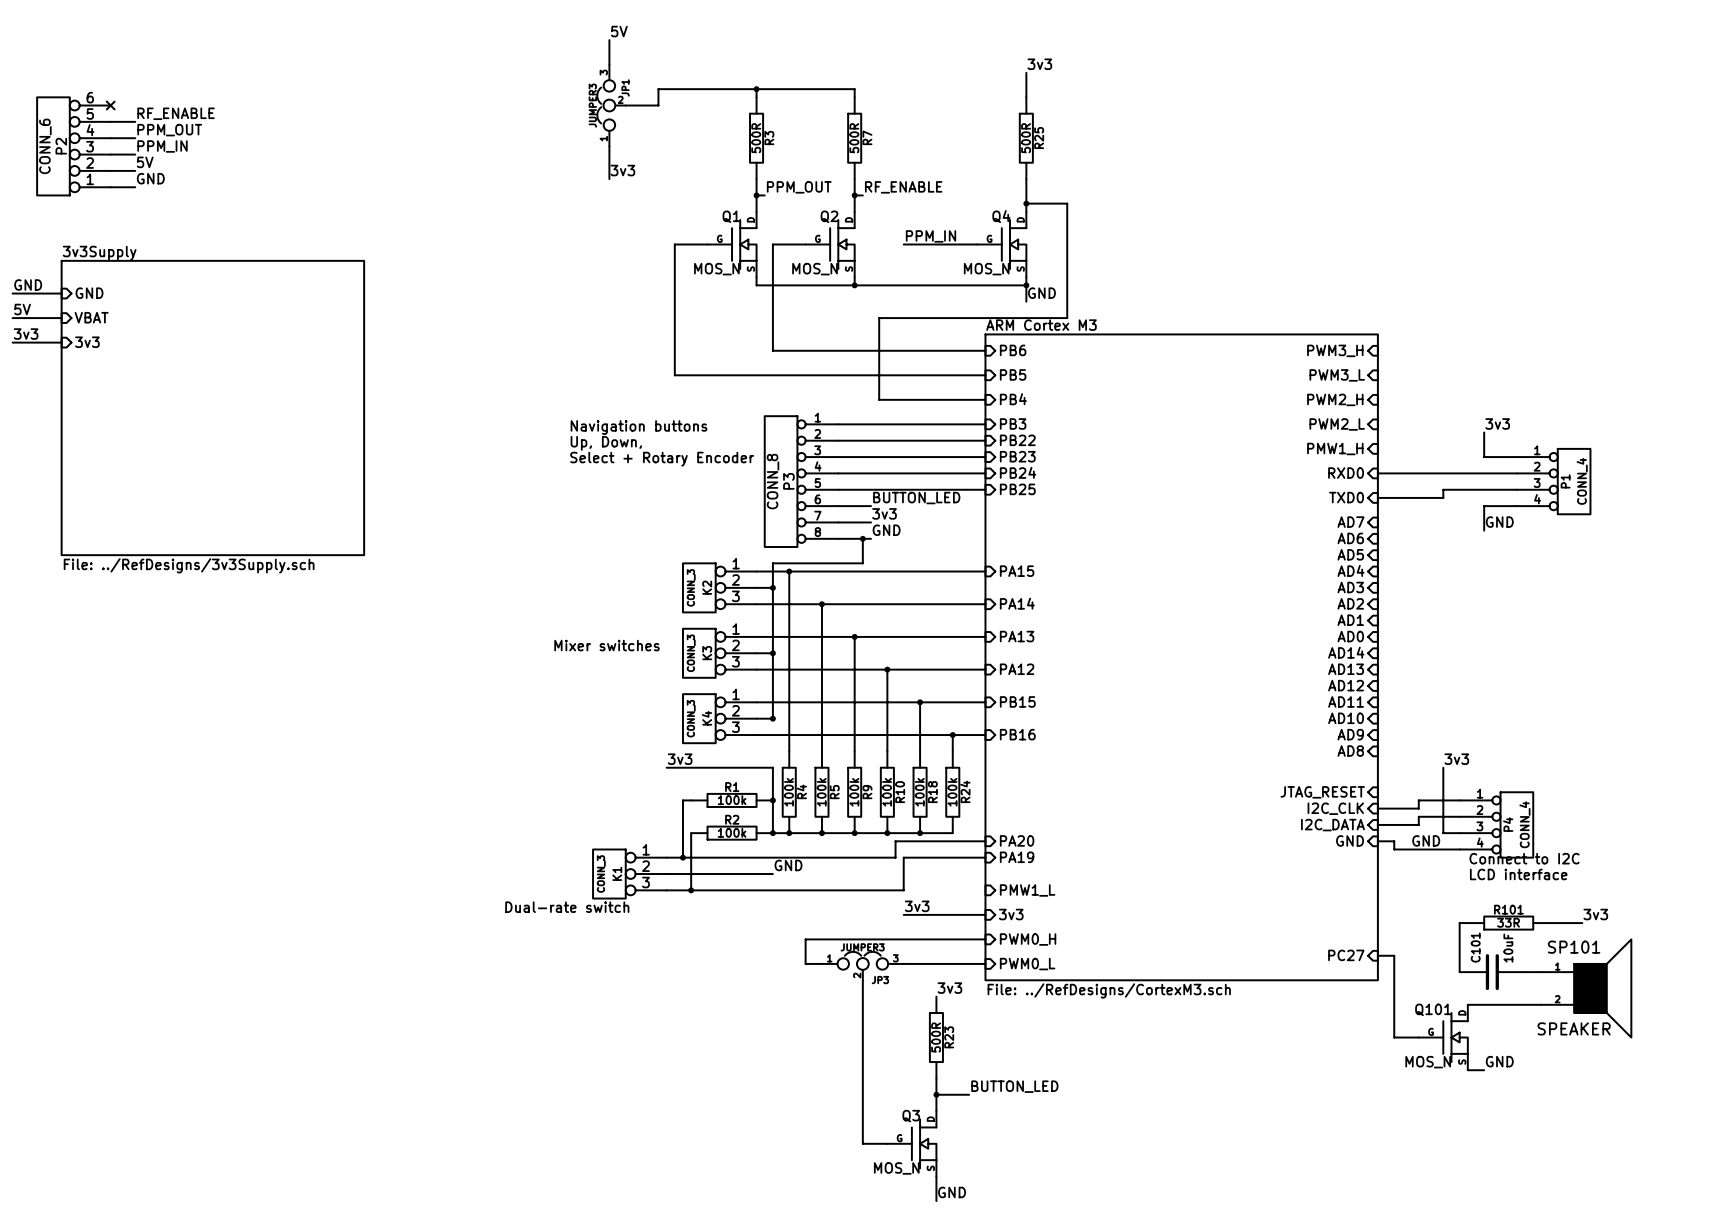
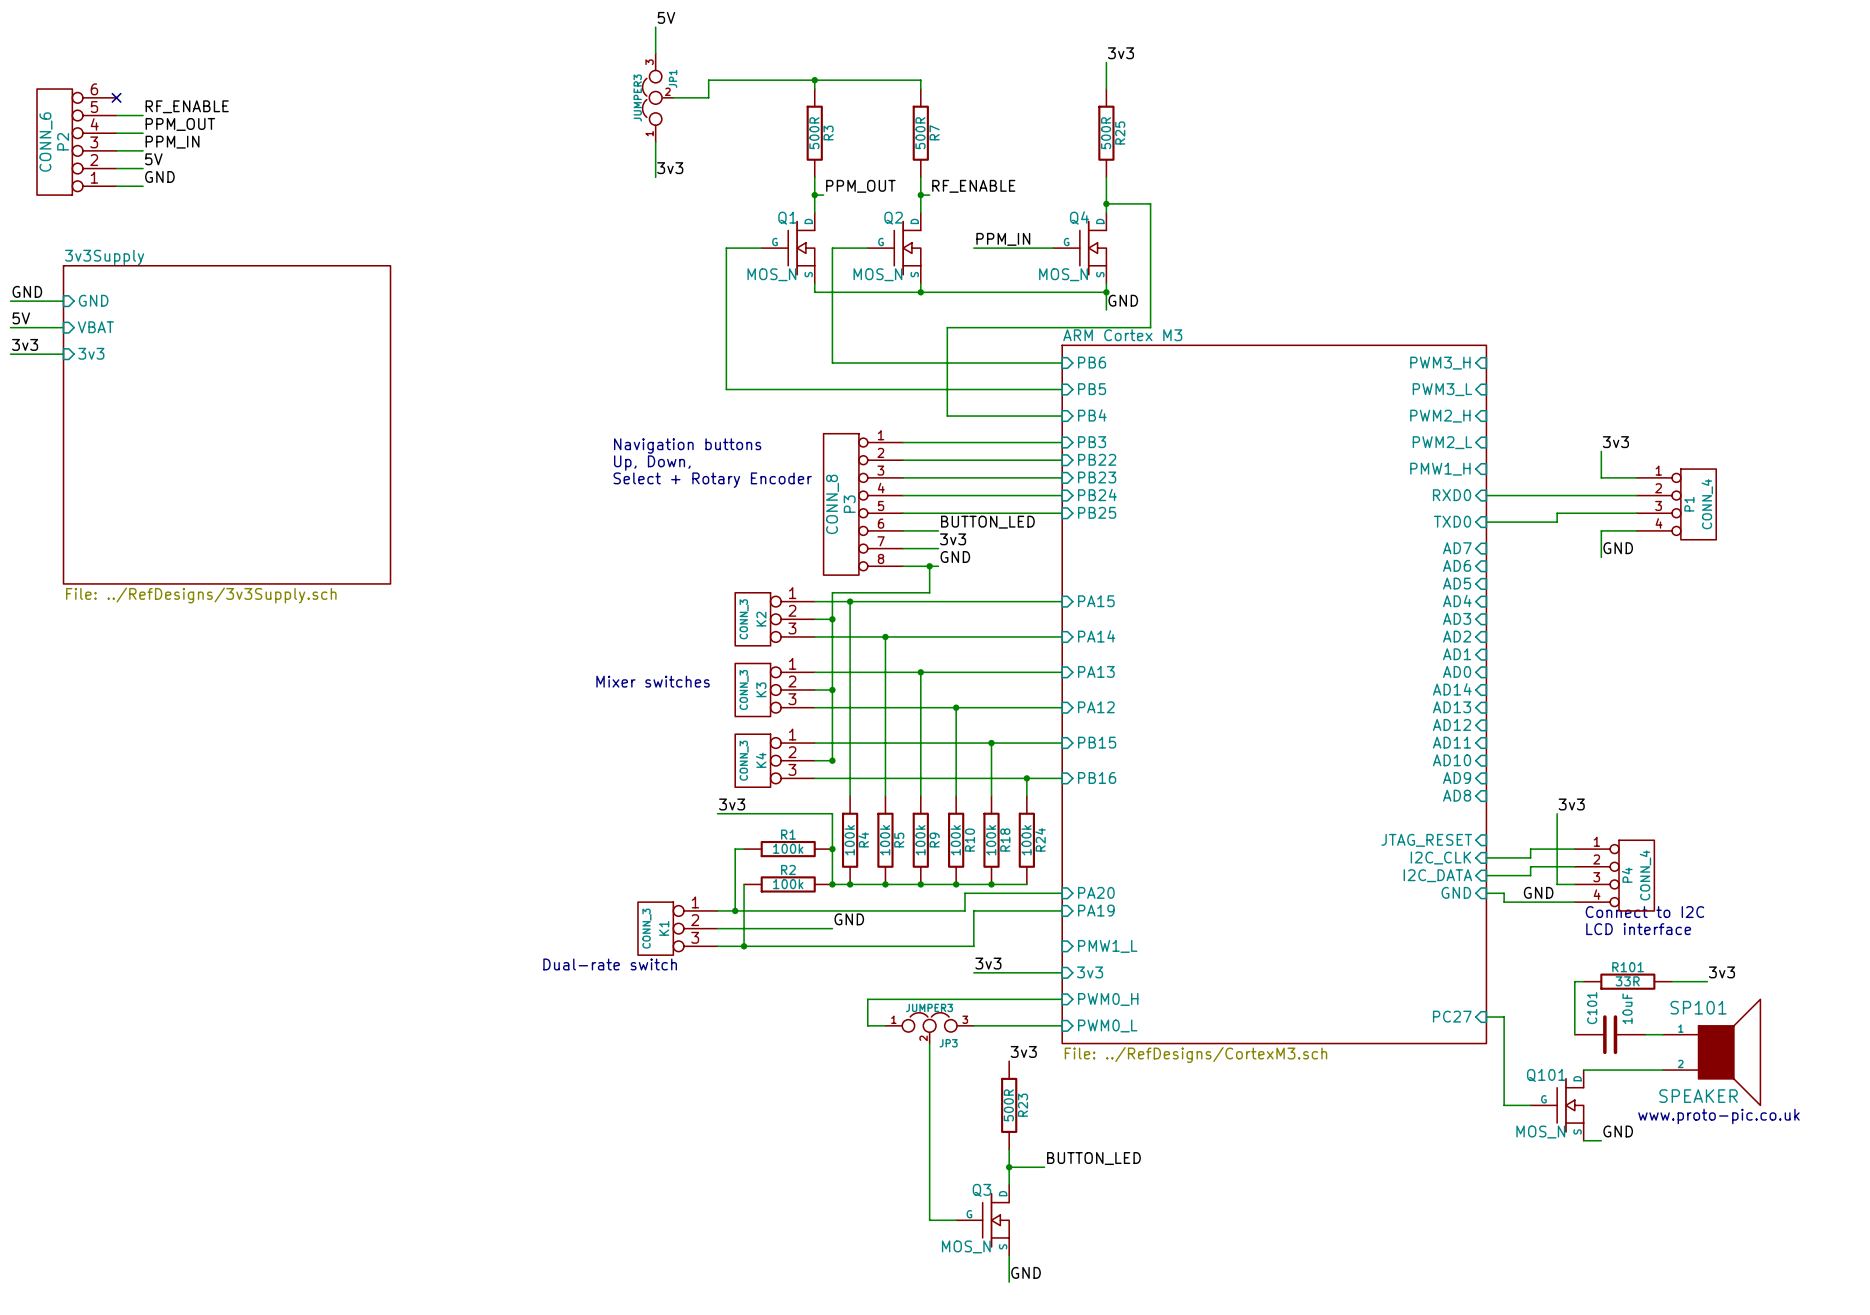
text: none -> www.proto-pic.co.uk (1718, 1116)

